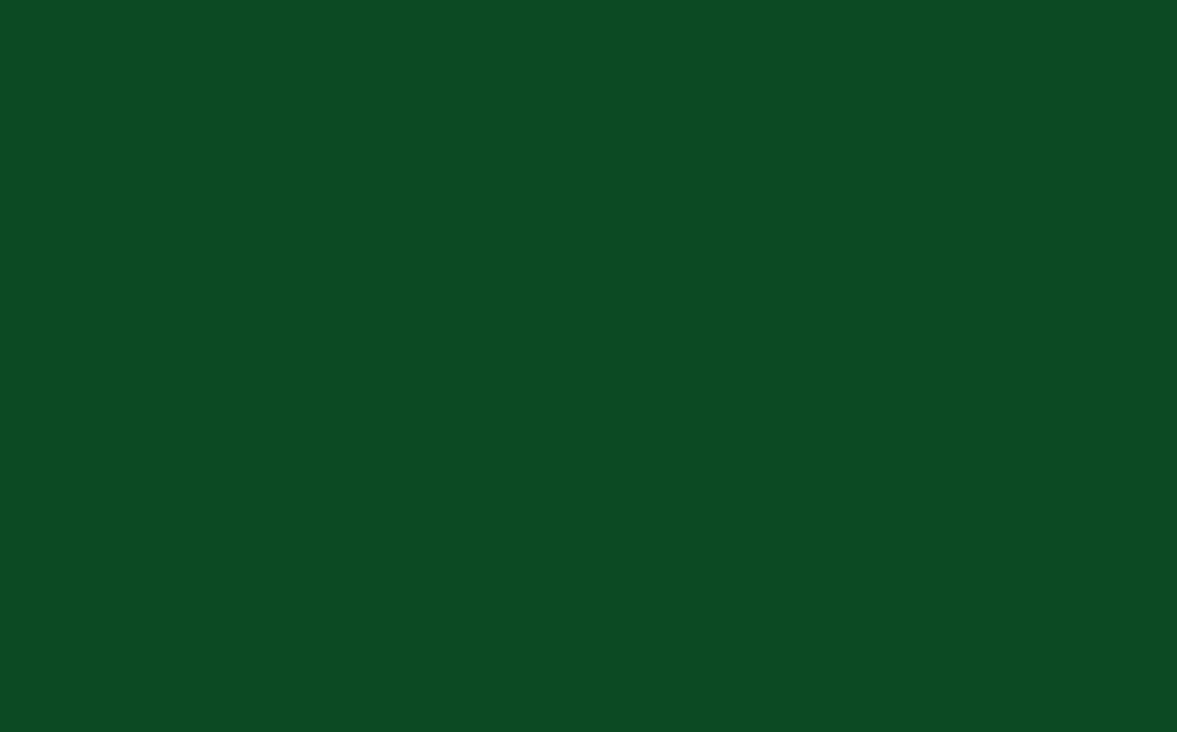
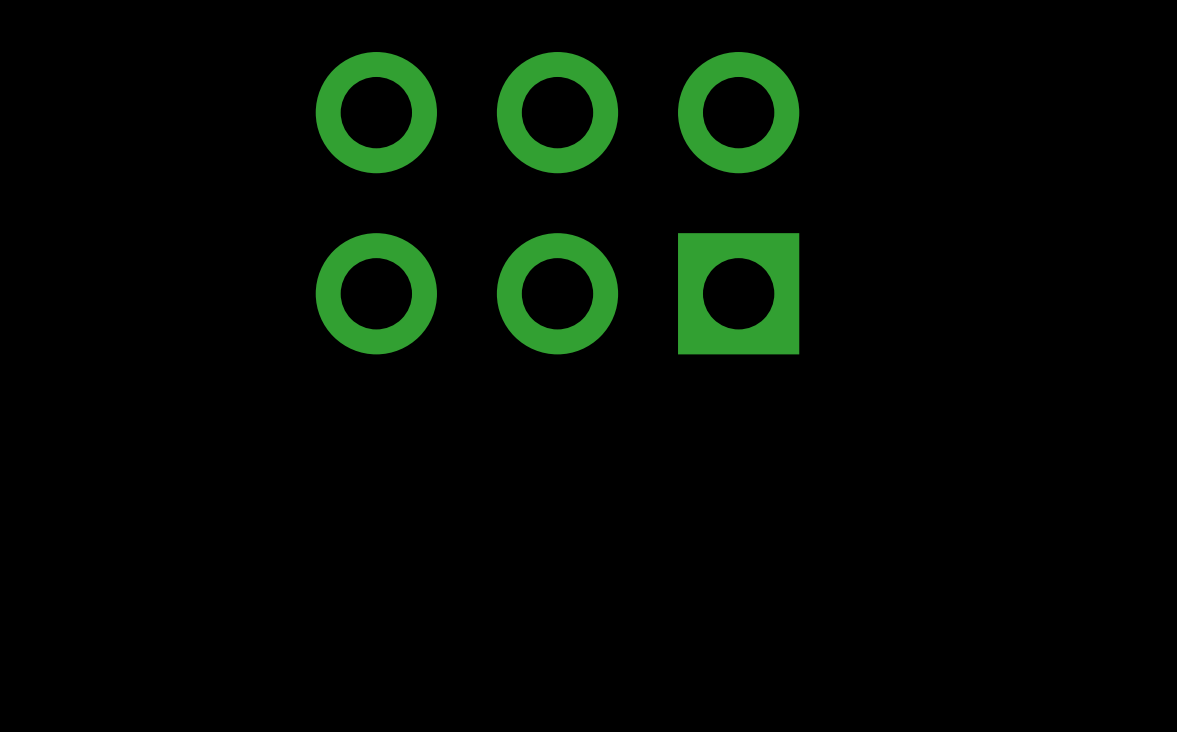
part: none -> (557, 203)

